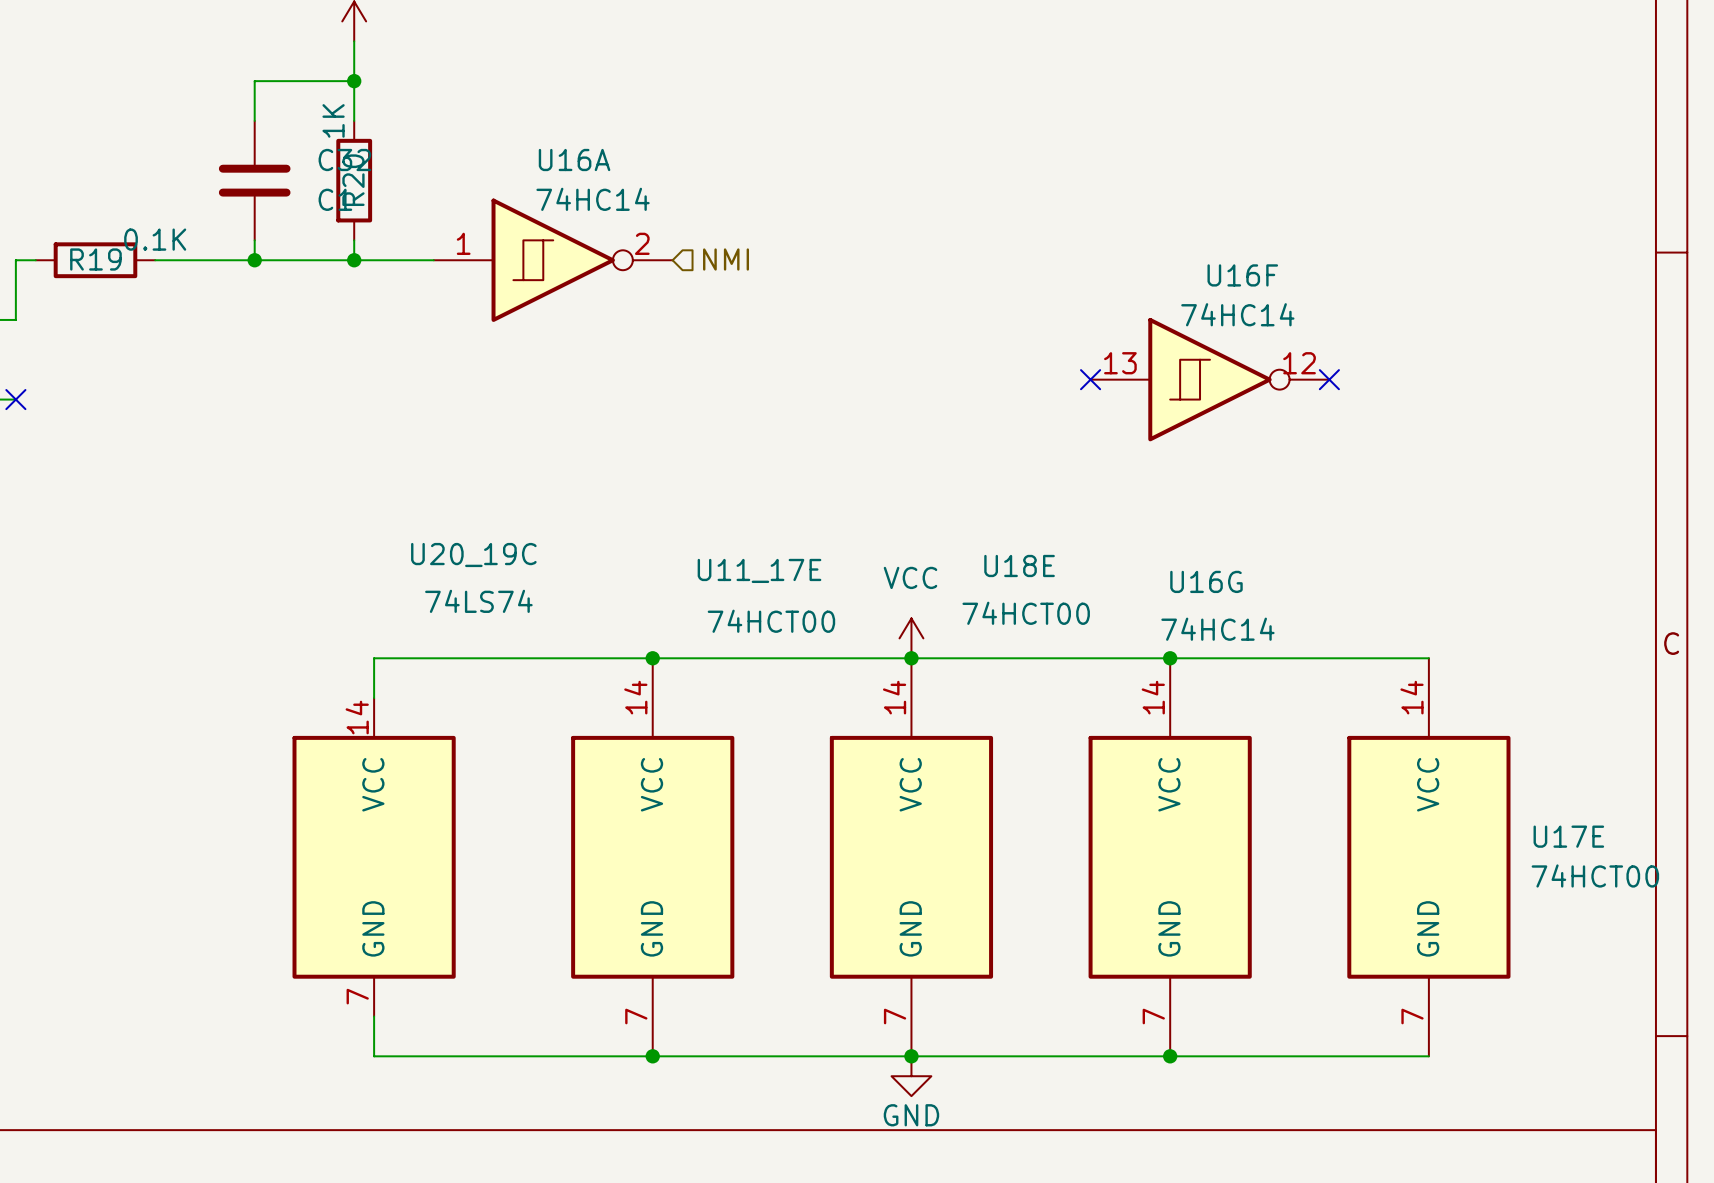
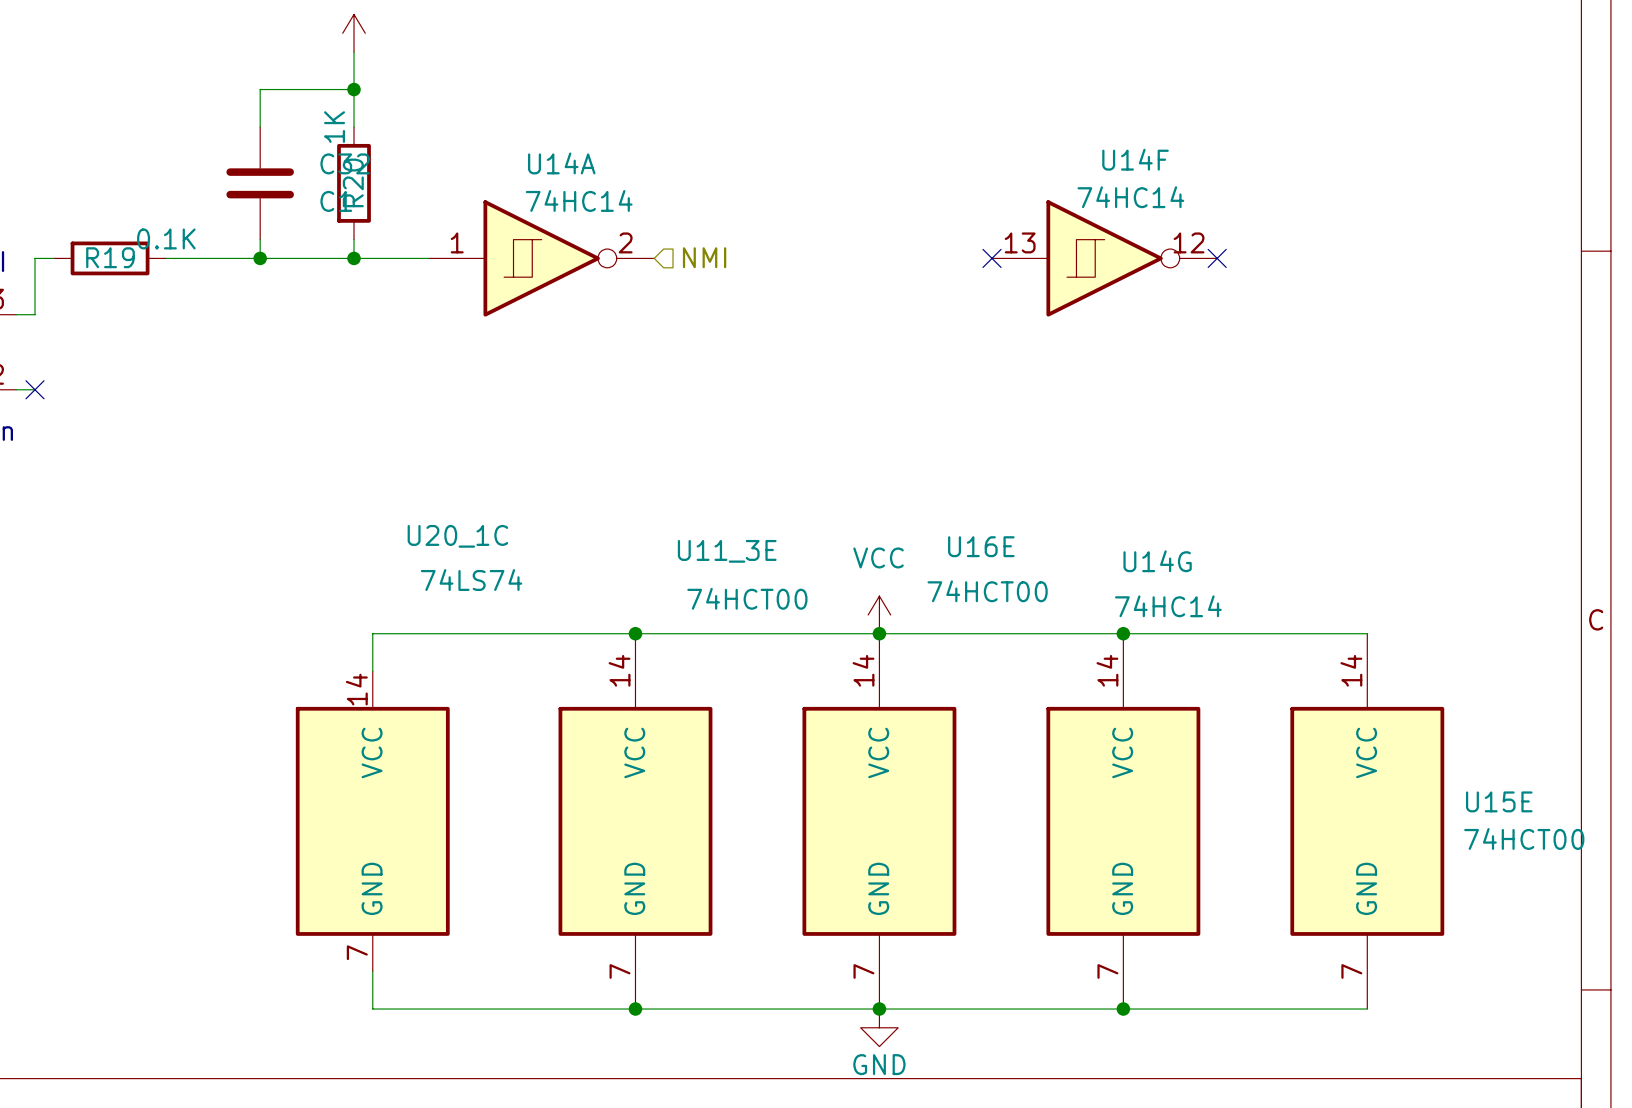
U16A name: U16A (574, 160) -> U14A (561, 163)
no-connect mark: none -> (992, 258)
U14F: none -> 74HC14 (1104, 258)
no-connect mark: none -> (1217, 258)
no-connect mark: (1090, 379) -> none
U16F: 74HC14 (1209, 379) -> none
no-connect mark: (1329, 379) -> none
U20_19C name: U20_19C (473, 555) -> U20_1C (457, 536)
U18E name: U18E (1019, 565) -> U16E (981, 546)
U11_17E name: U11_17E (759, 570) -> U11_3E (727, 551)
U16G name: U16G (1206, 581) -> U14G (1157, 561)
U17E name: U17E (1568, 836) -> U15E (1499, 801)

